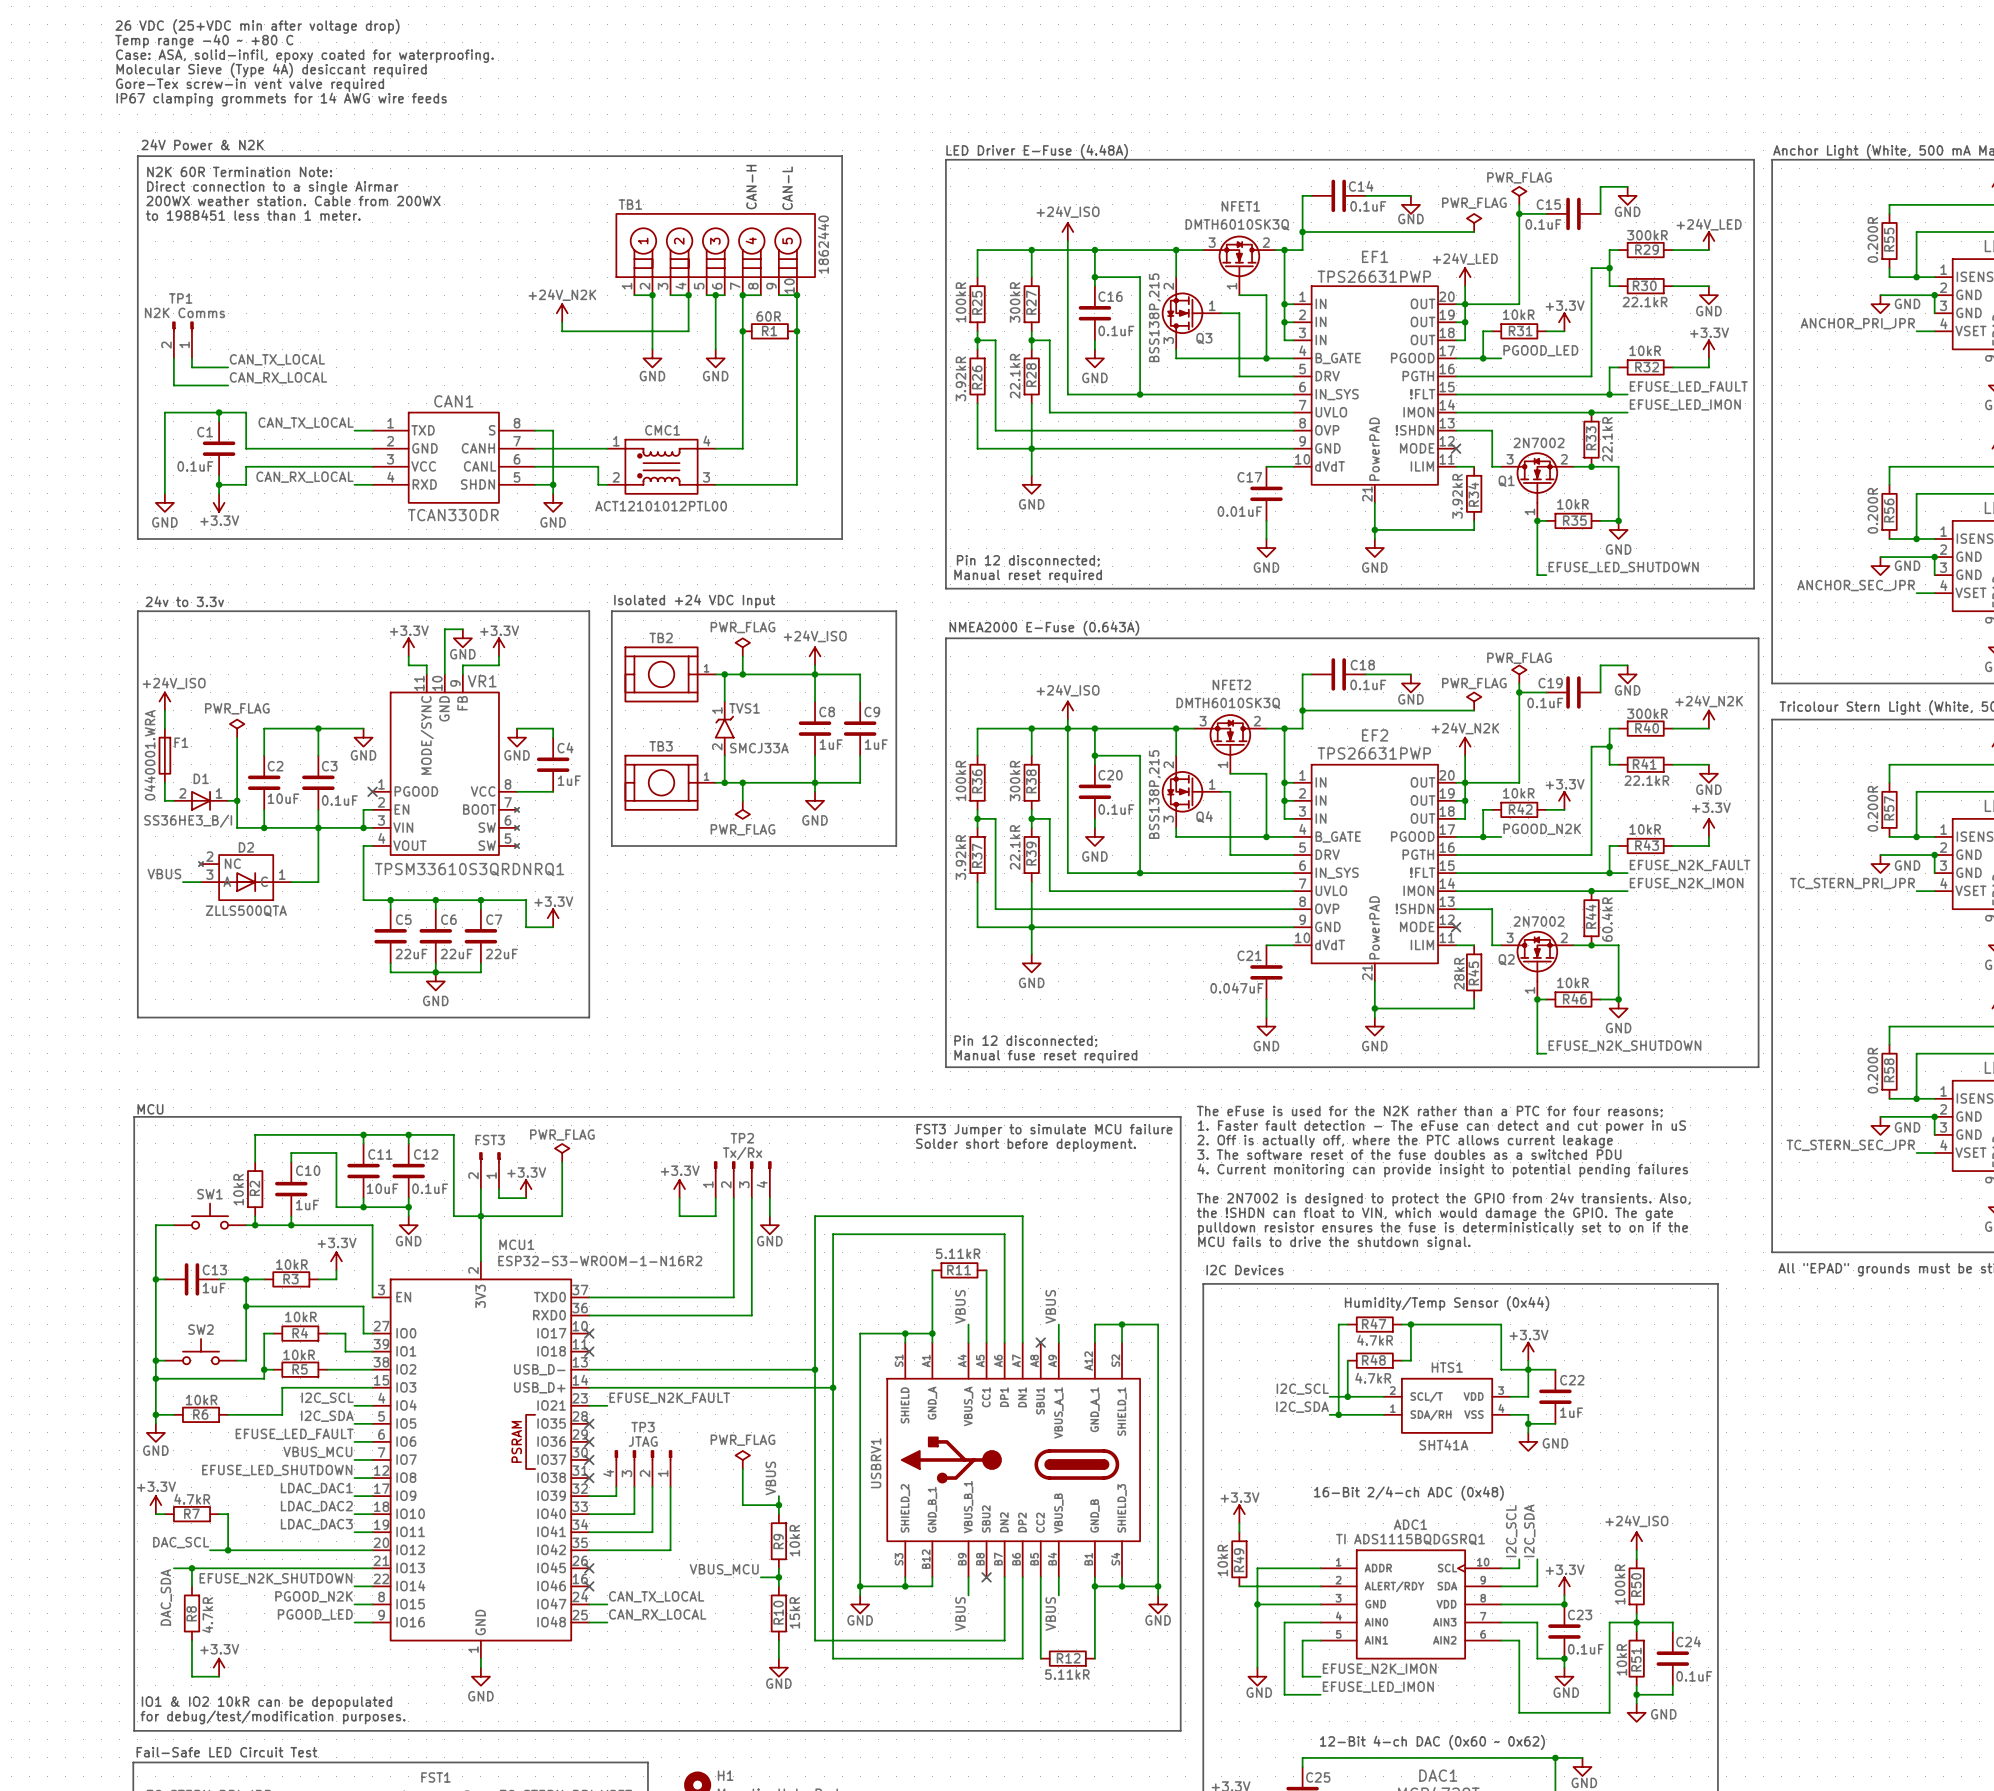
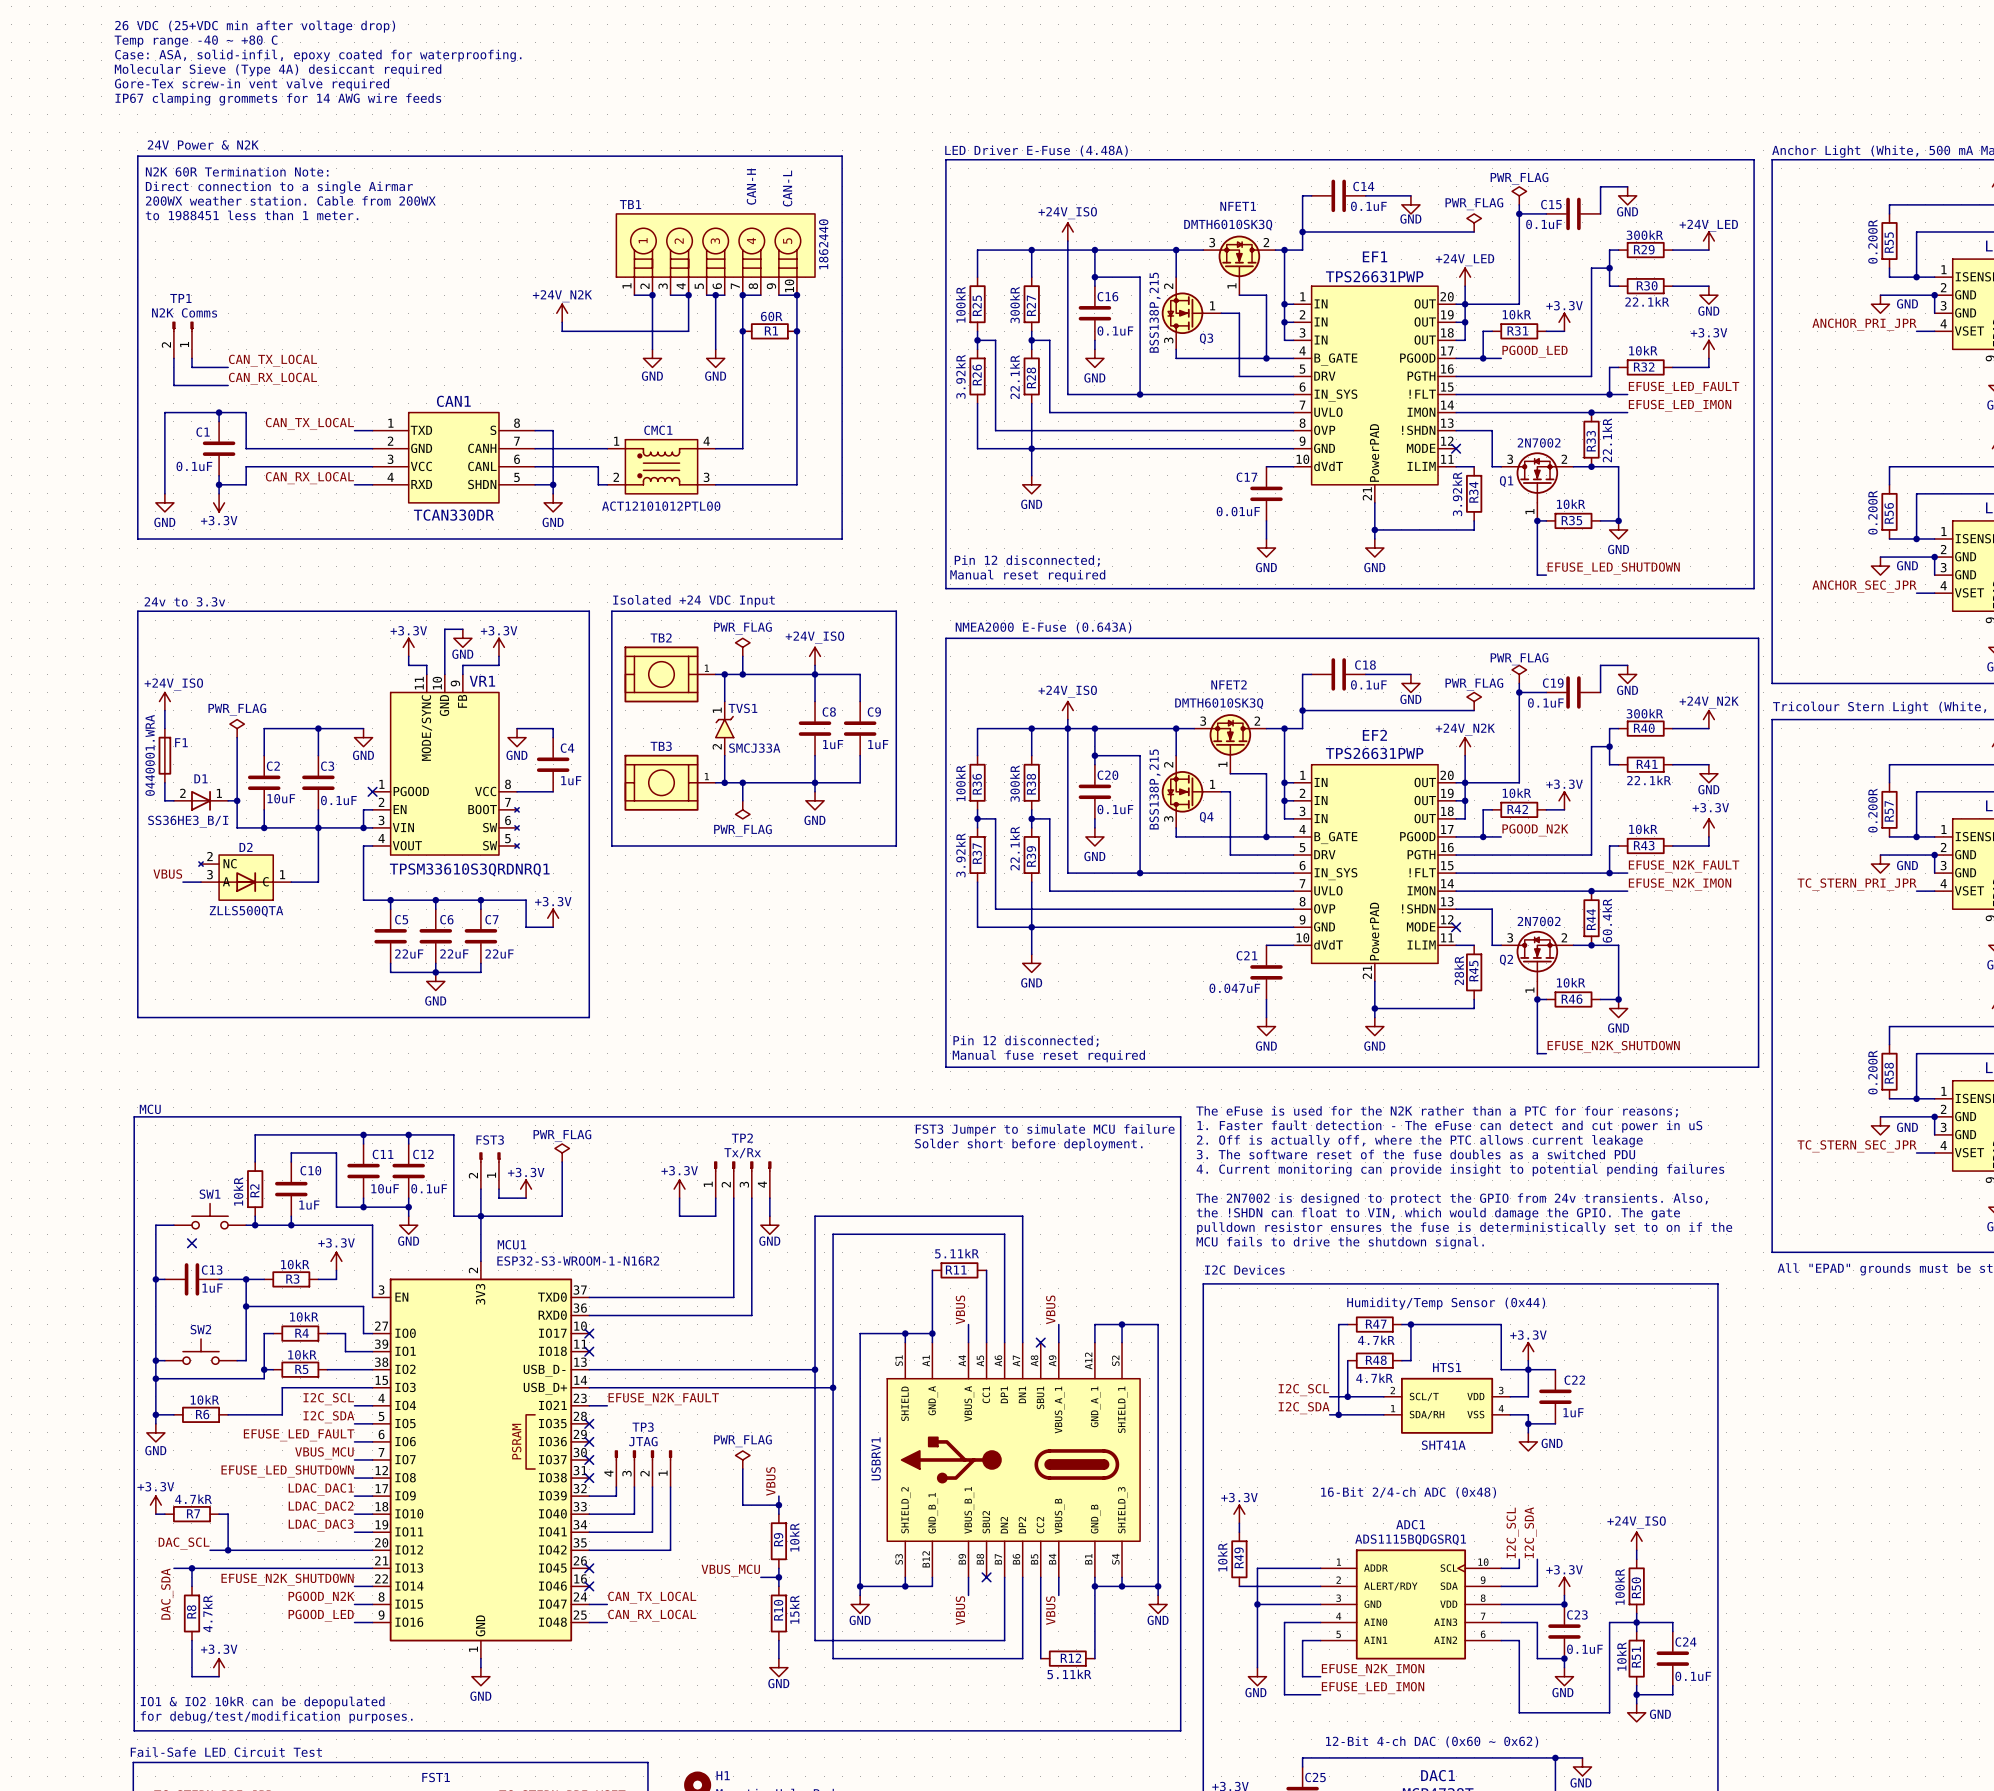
no-connect mark: none -> (191, 1243)
ADC1 value: TI ADS1115BQDGSRQ1 (1410, 1539) -> ADS1115BQDGSRQ1 (1410, 1539)

